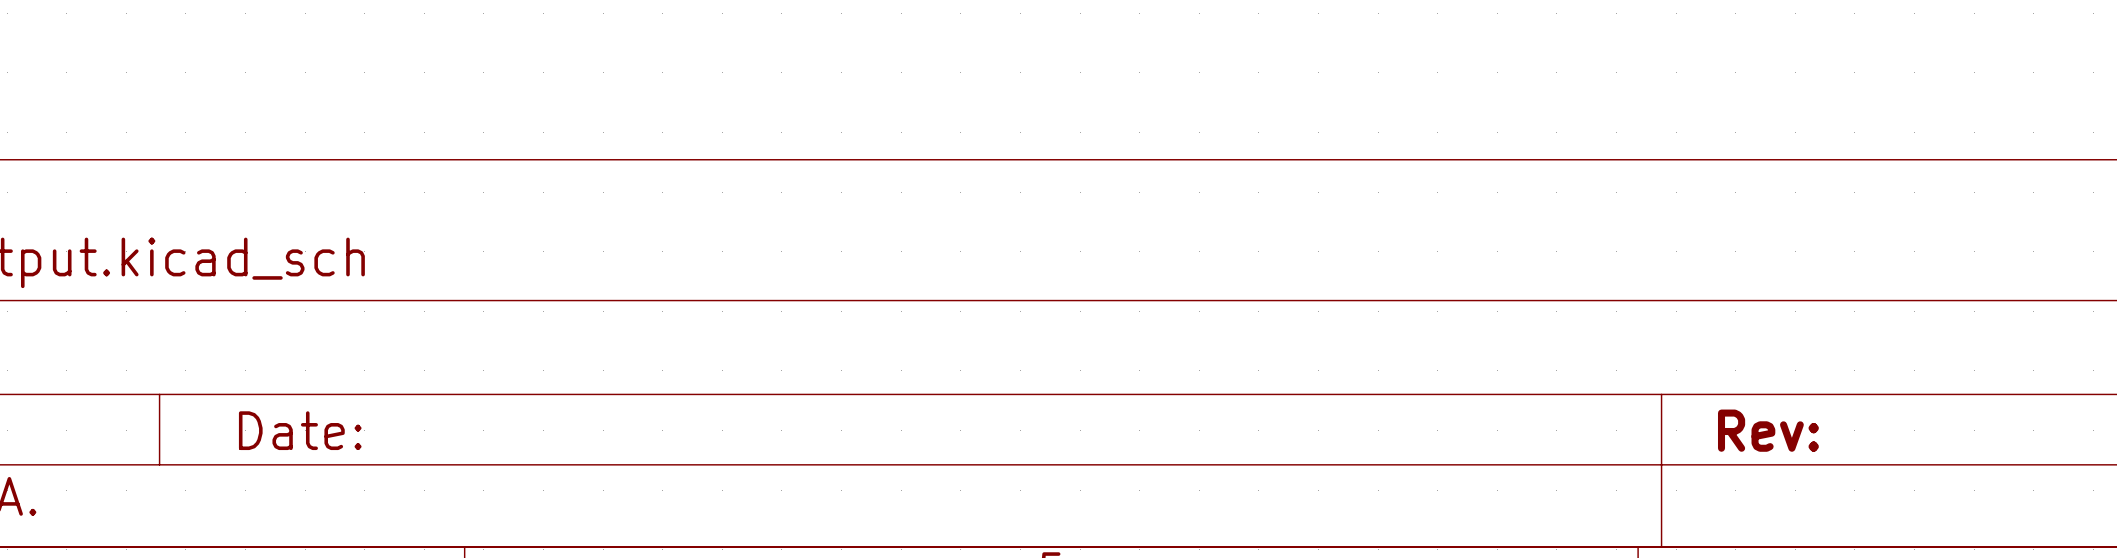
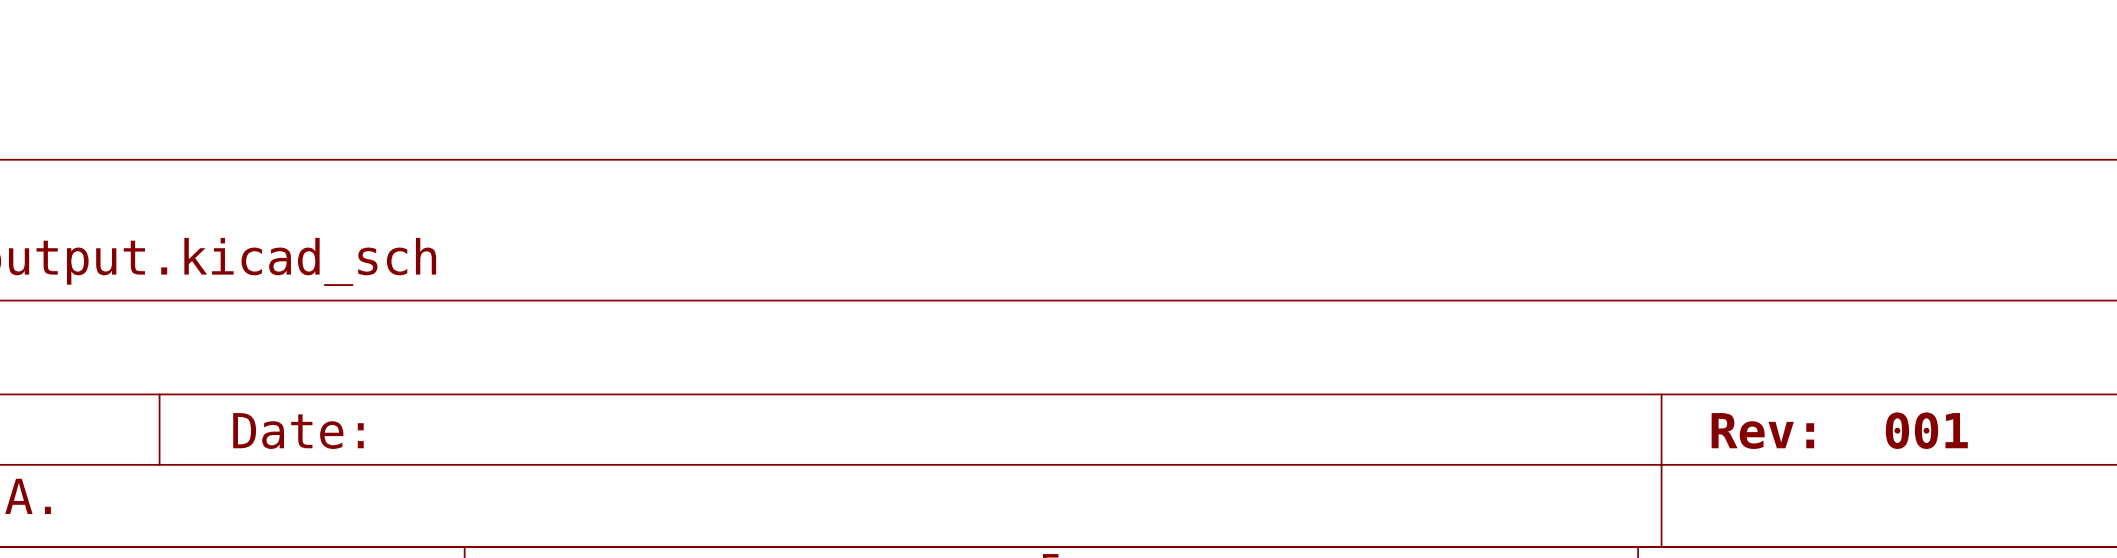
title block: Rev: (1768, 430) -> Rev: 001 (1839, 430)

